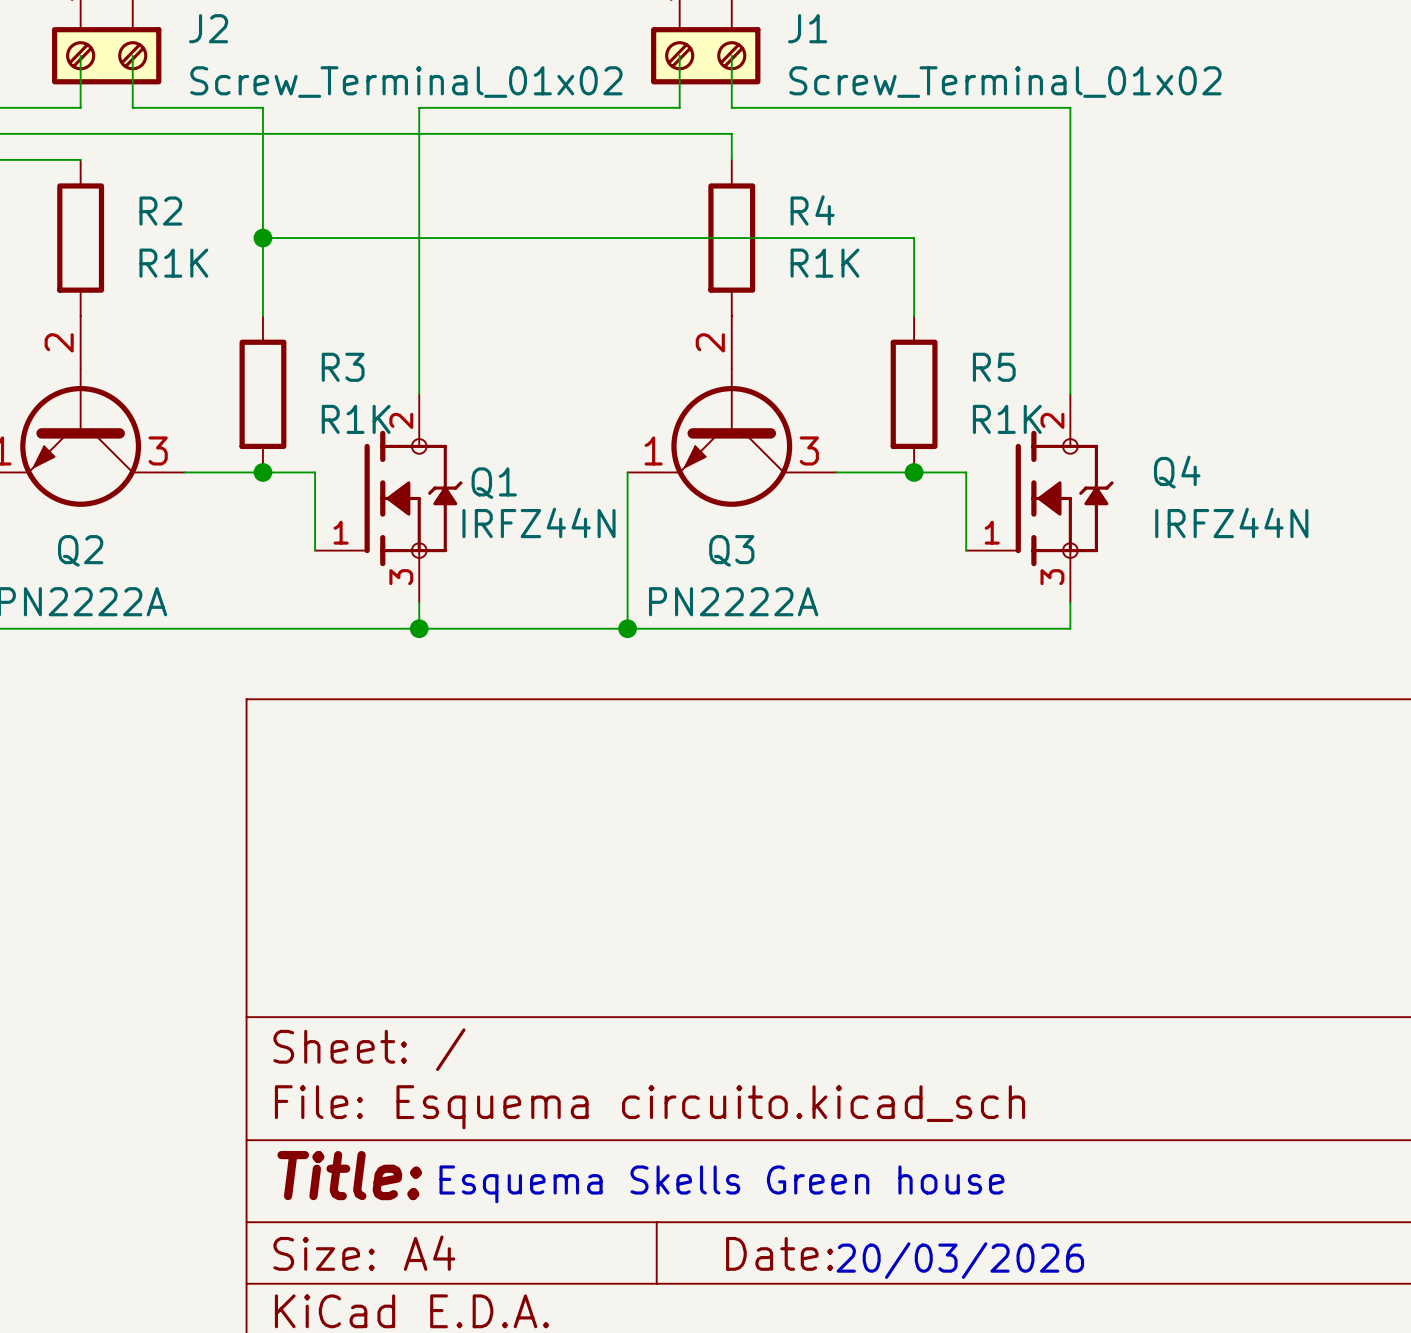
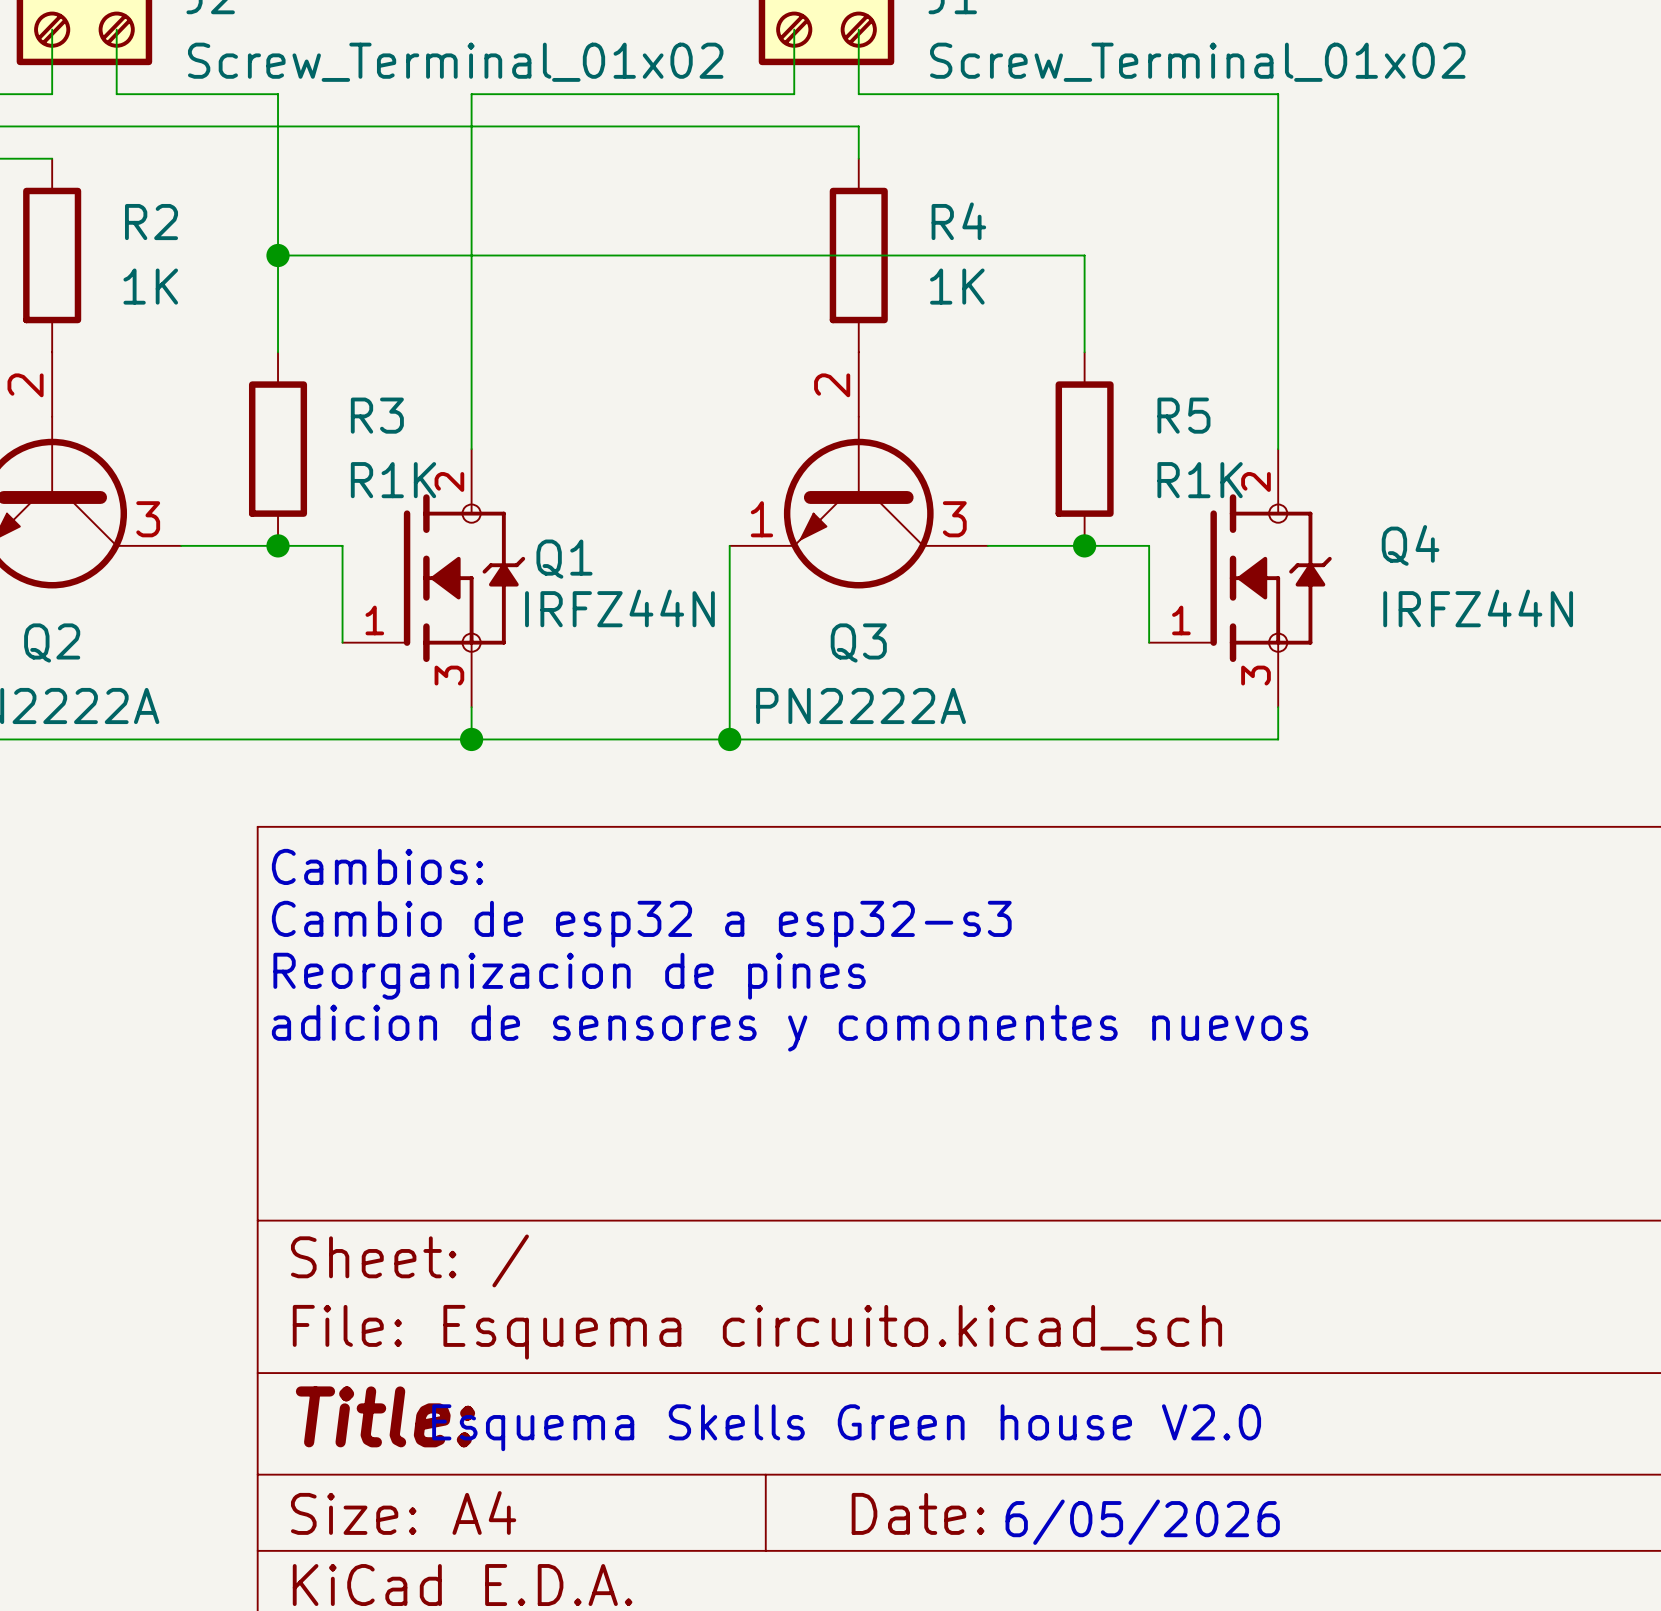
R2 value: R1K (173, 263) -> 1K (150, 286)
R4 value: R1K (824, 263) -> 1K (957, 286)
text: none -> Cambios: (377, 866)
text: none -> Cambio de esp32 a esp32-s3 (641, 924)
text: none -> Reorganizacion de pines (569, 976)
text: none -> adicion de sensores y comonentes nuevos (790, 1028)
text: Esquema Skells Green house (721, 1184) -> Esquema Skells Green house V2.0 (846, 1427)
text: 20/03/2026 (960, 1260) -> 6/05/2026 (1142, 1522)

